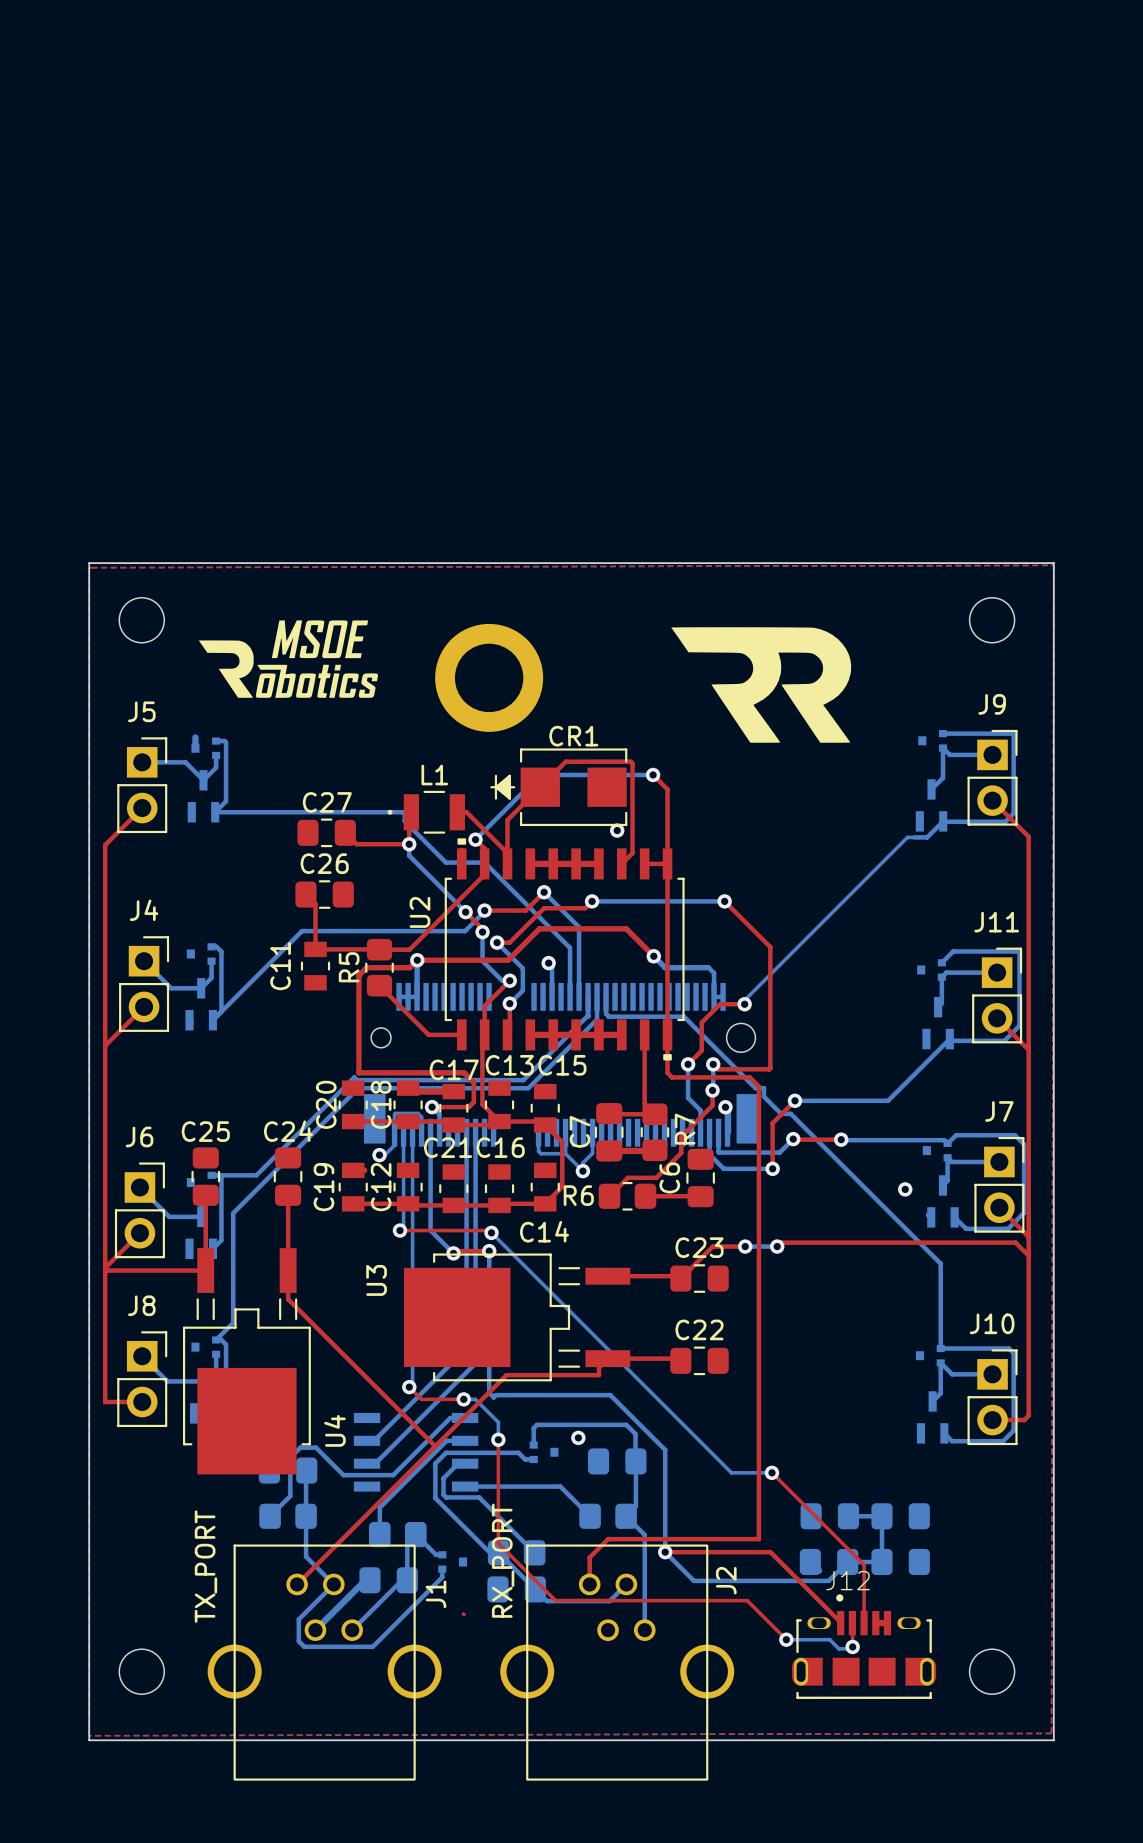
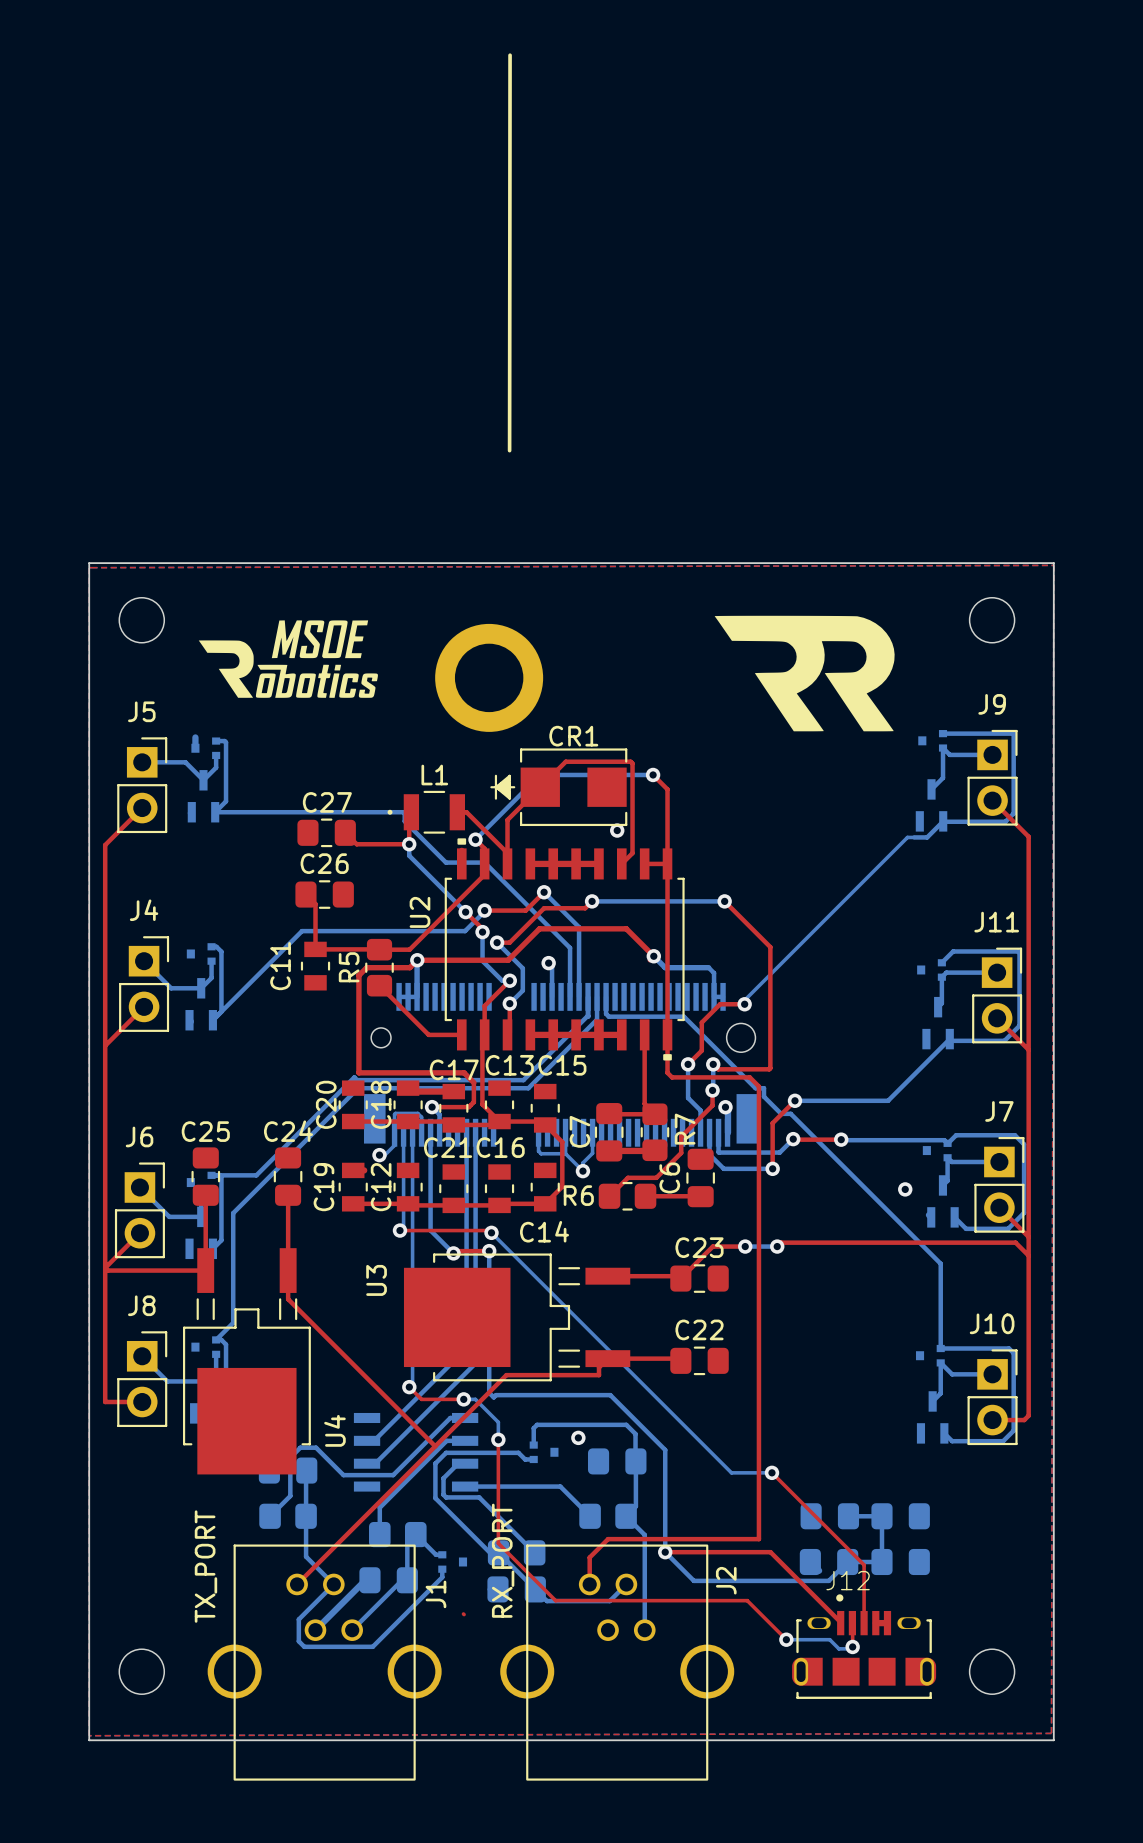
line: none -> (510, 55) (509, 450)
drawing position: (761, 684) -> (804, 673)

